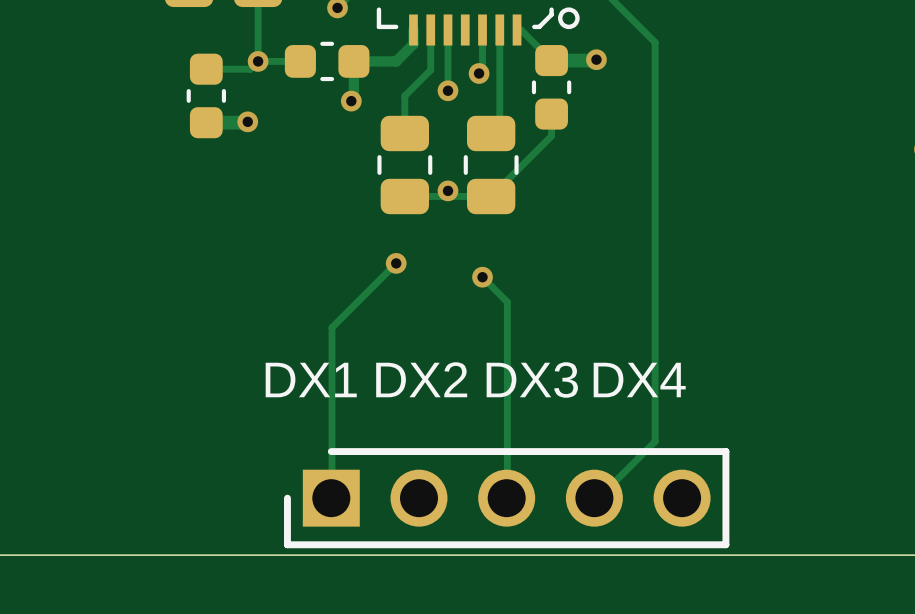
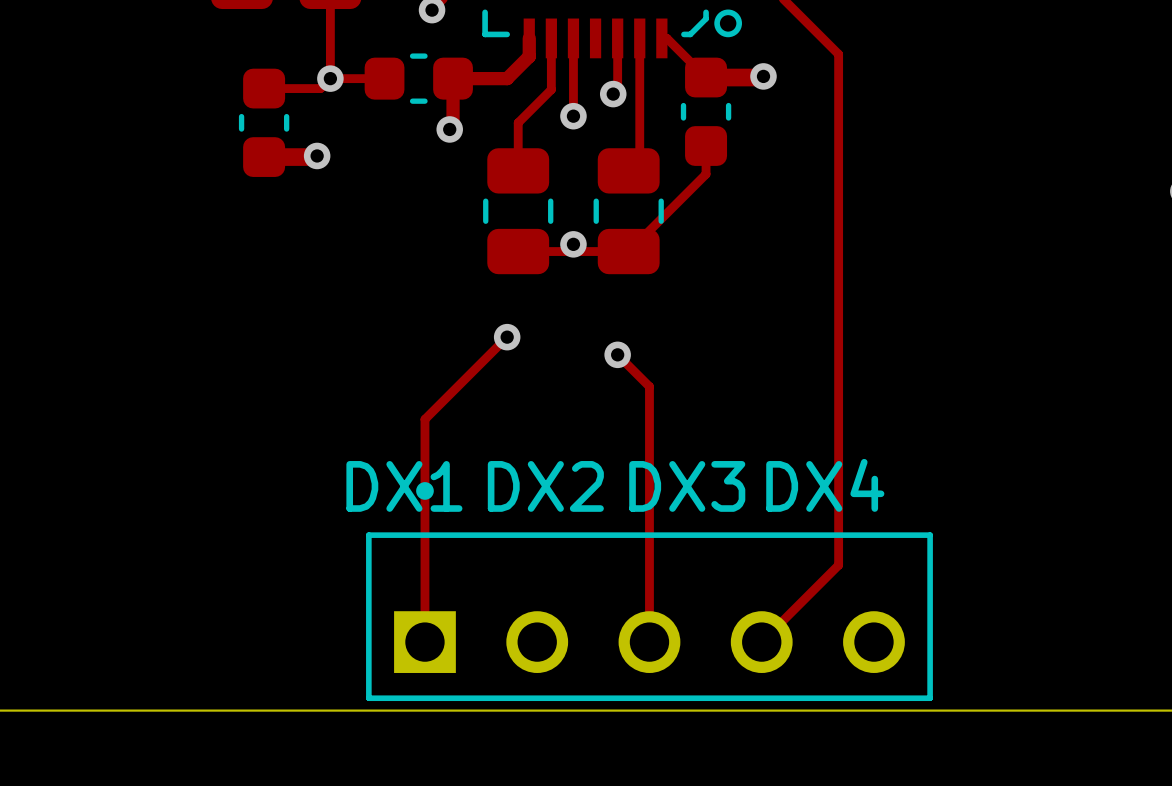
part: none -> (649, 591)
part: (506, 498) -> none

